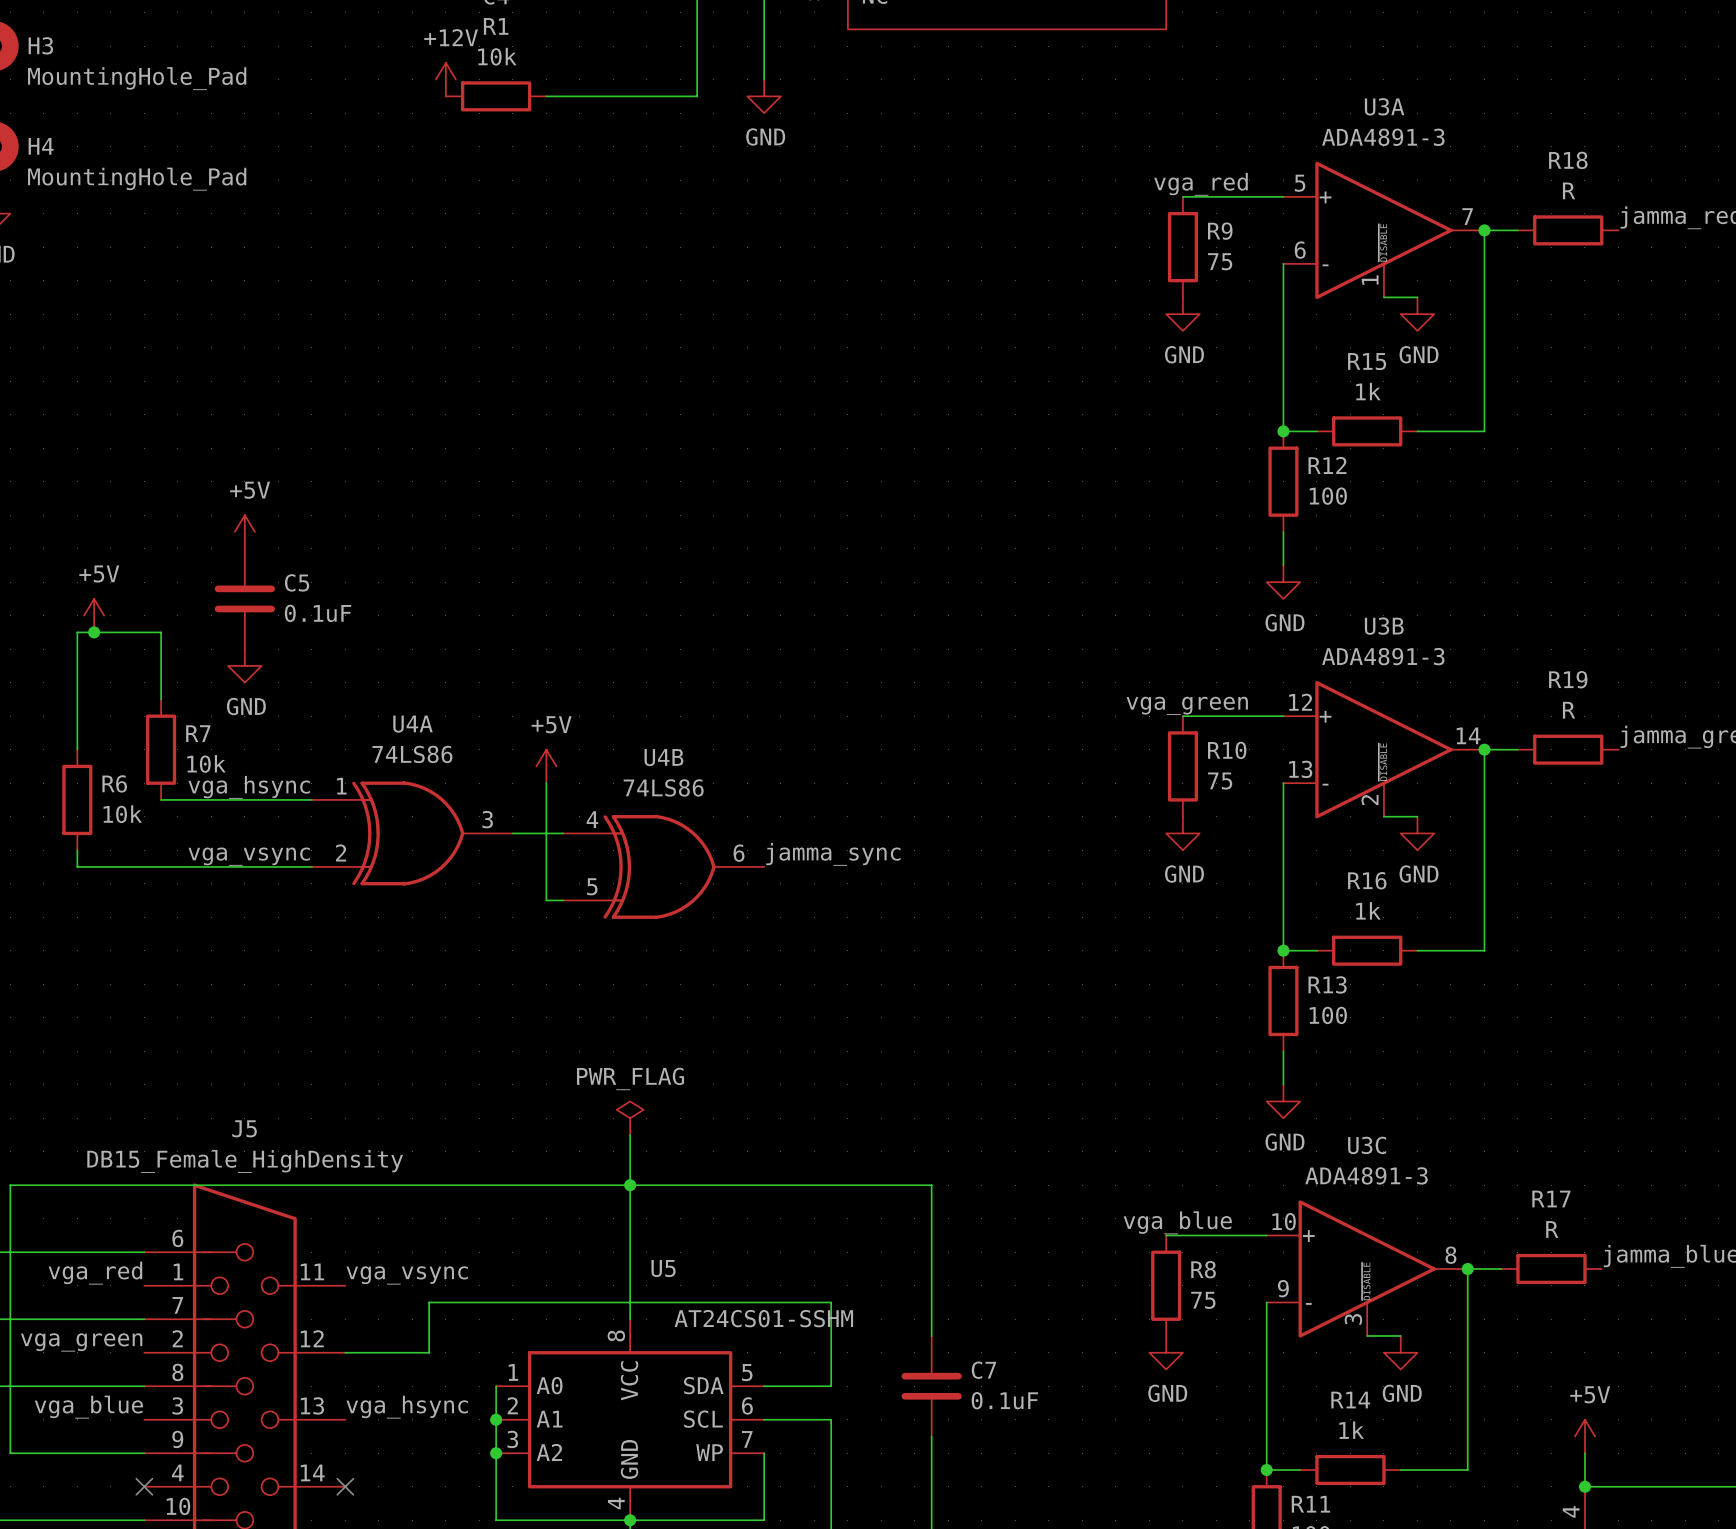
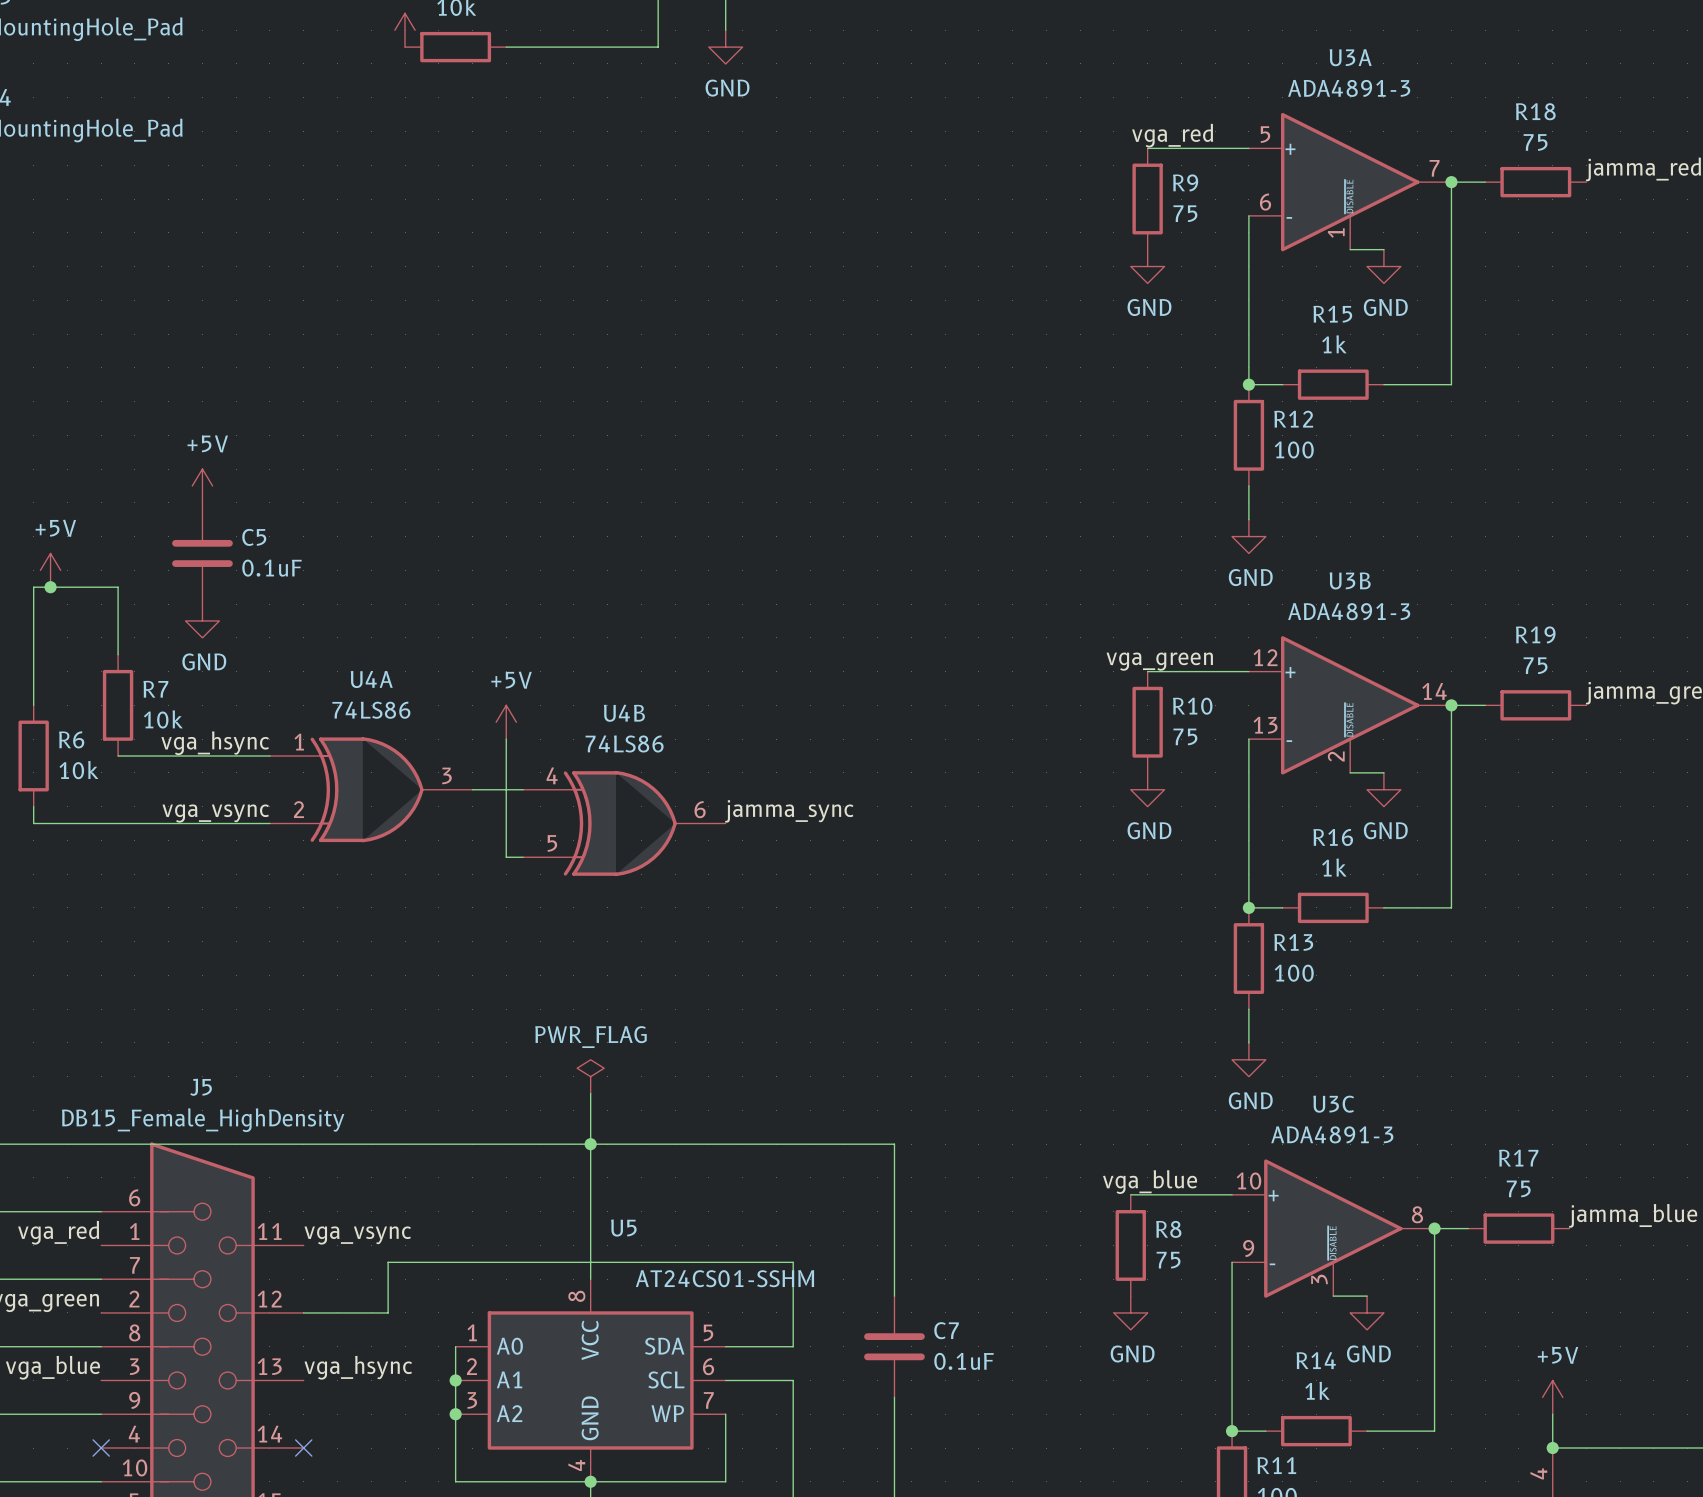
R18 value: R (1569, 190) -> 75 (1535, 142)
R19 value: R (1569, 710) -> 75 (1535, 665)
R17 value: R (1552, 1229) -> 75 (1518, 1188)

